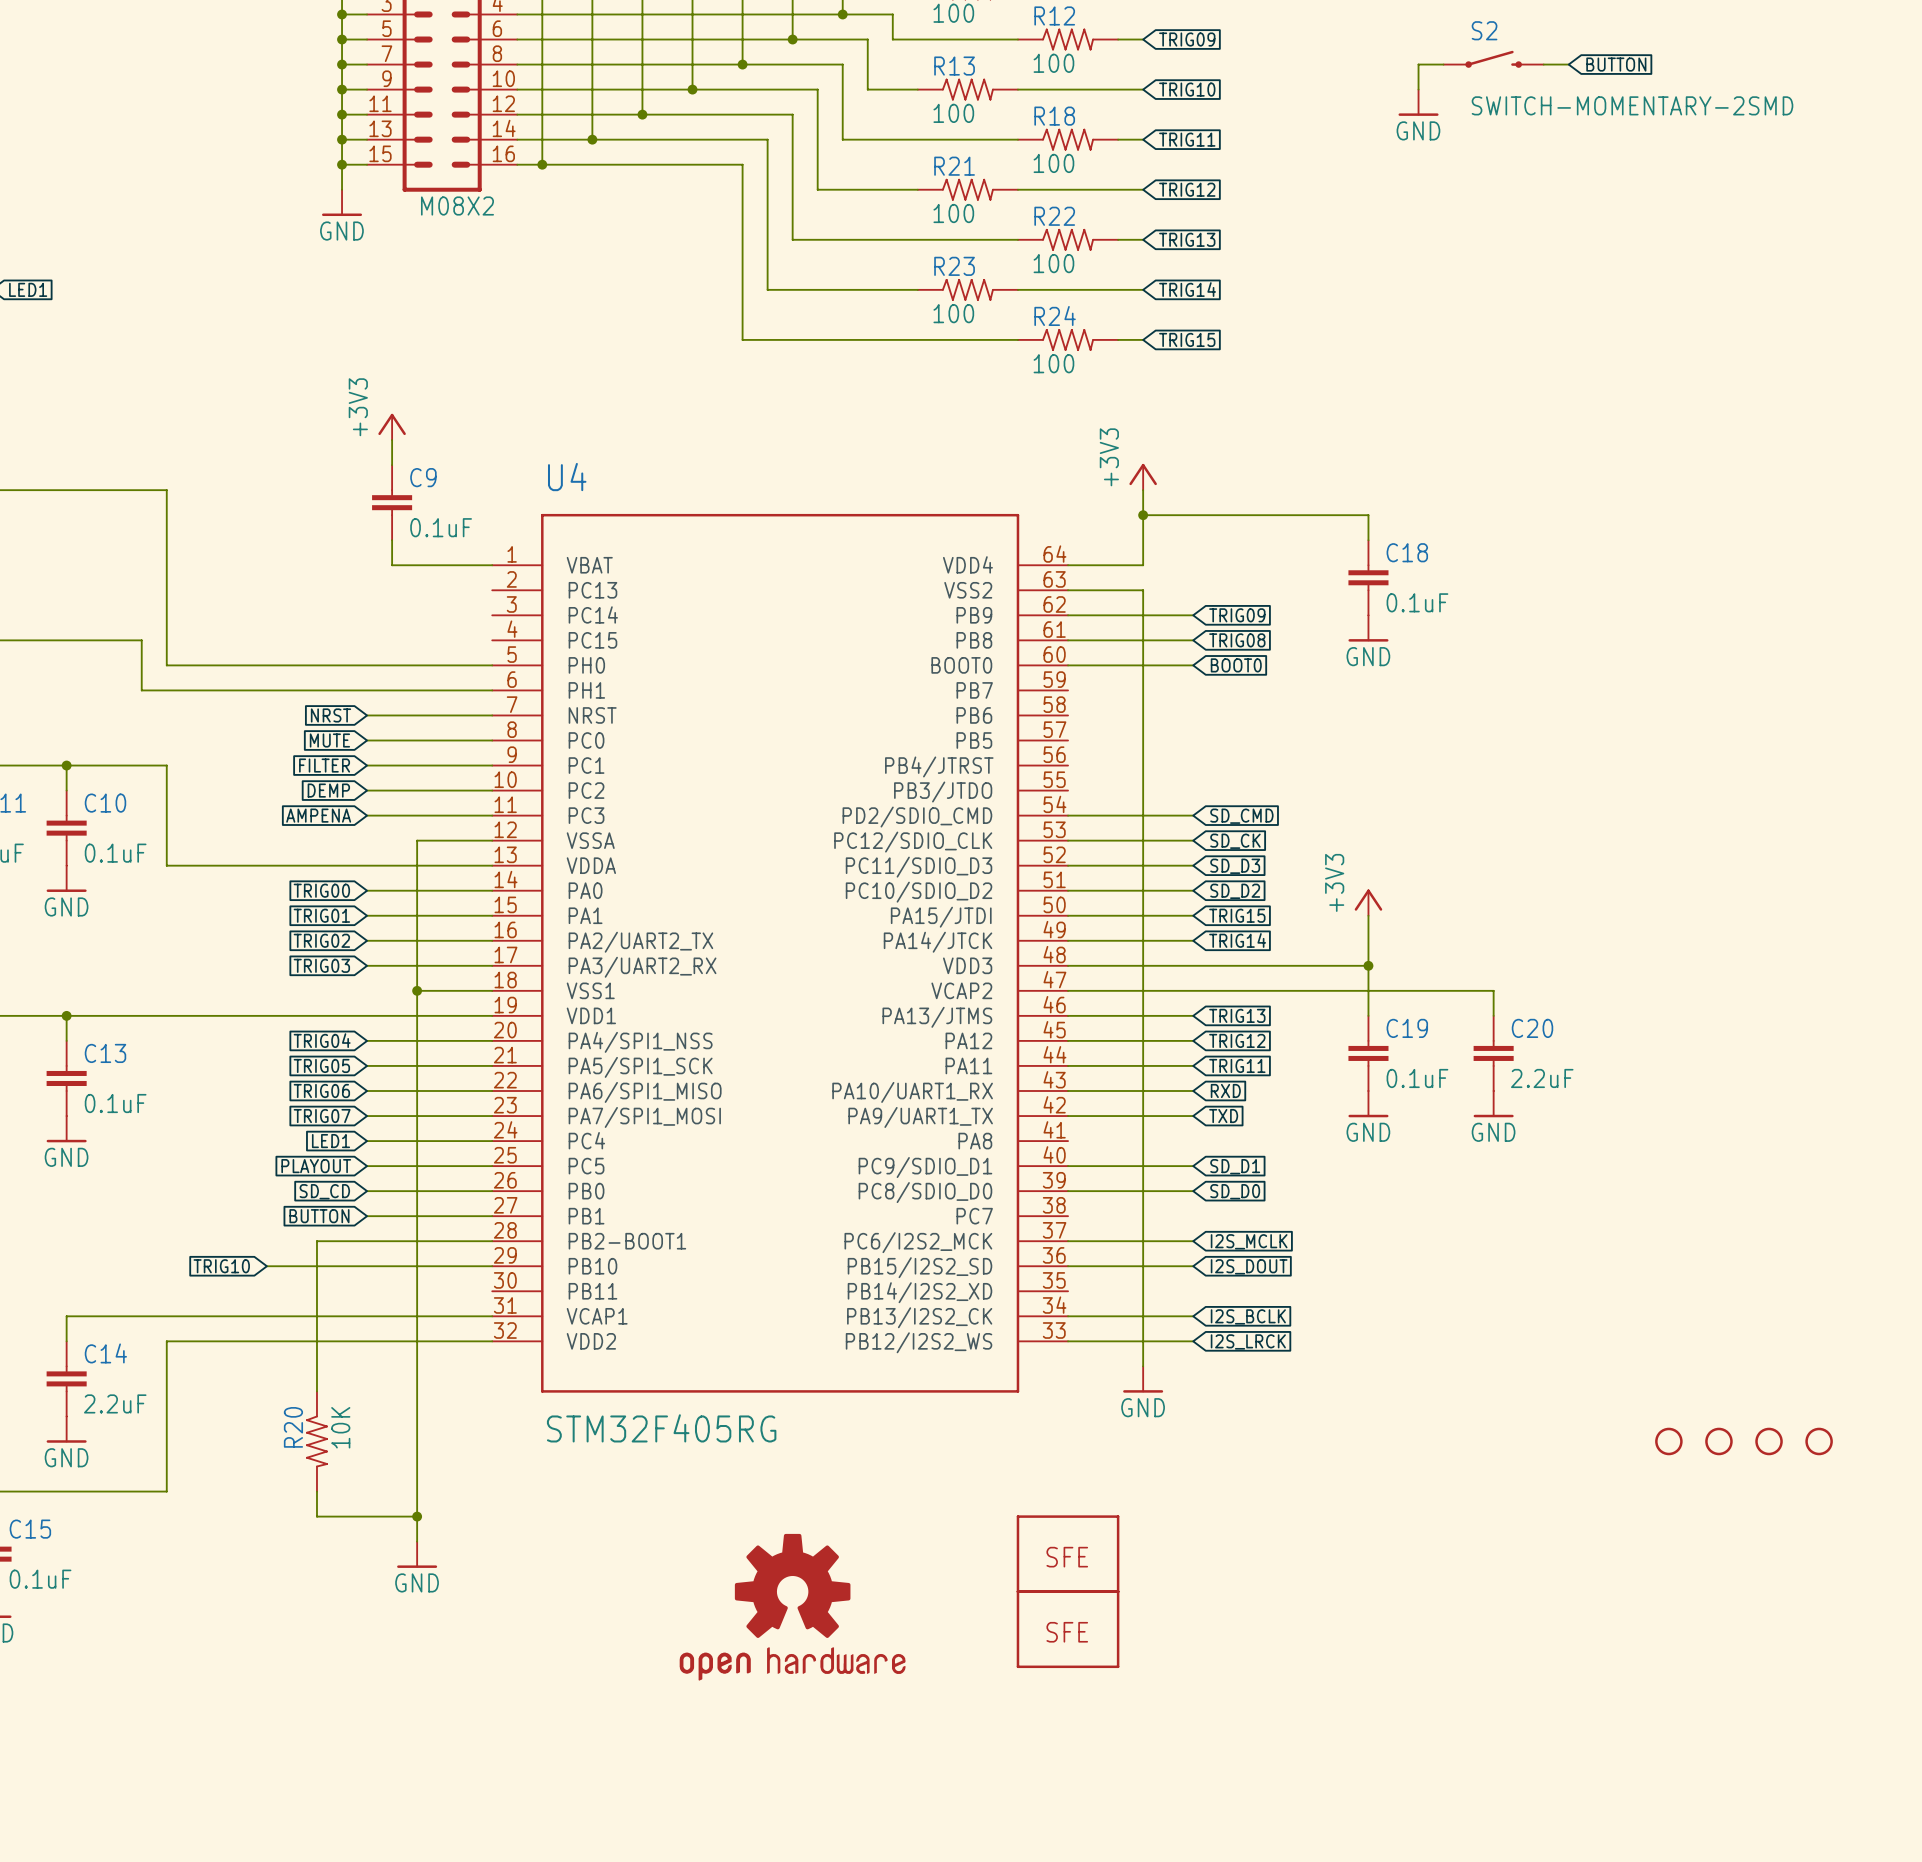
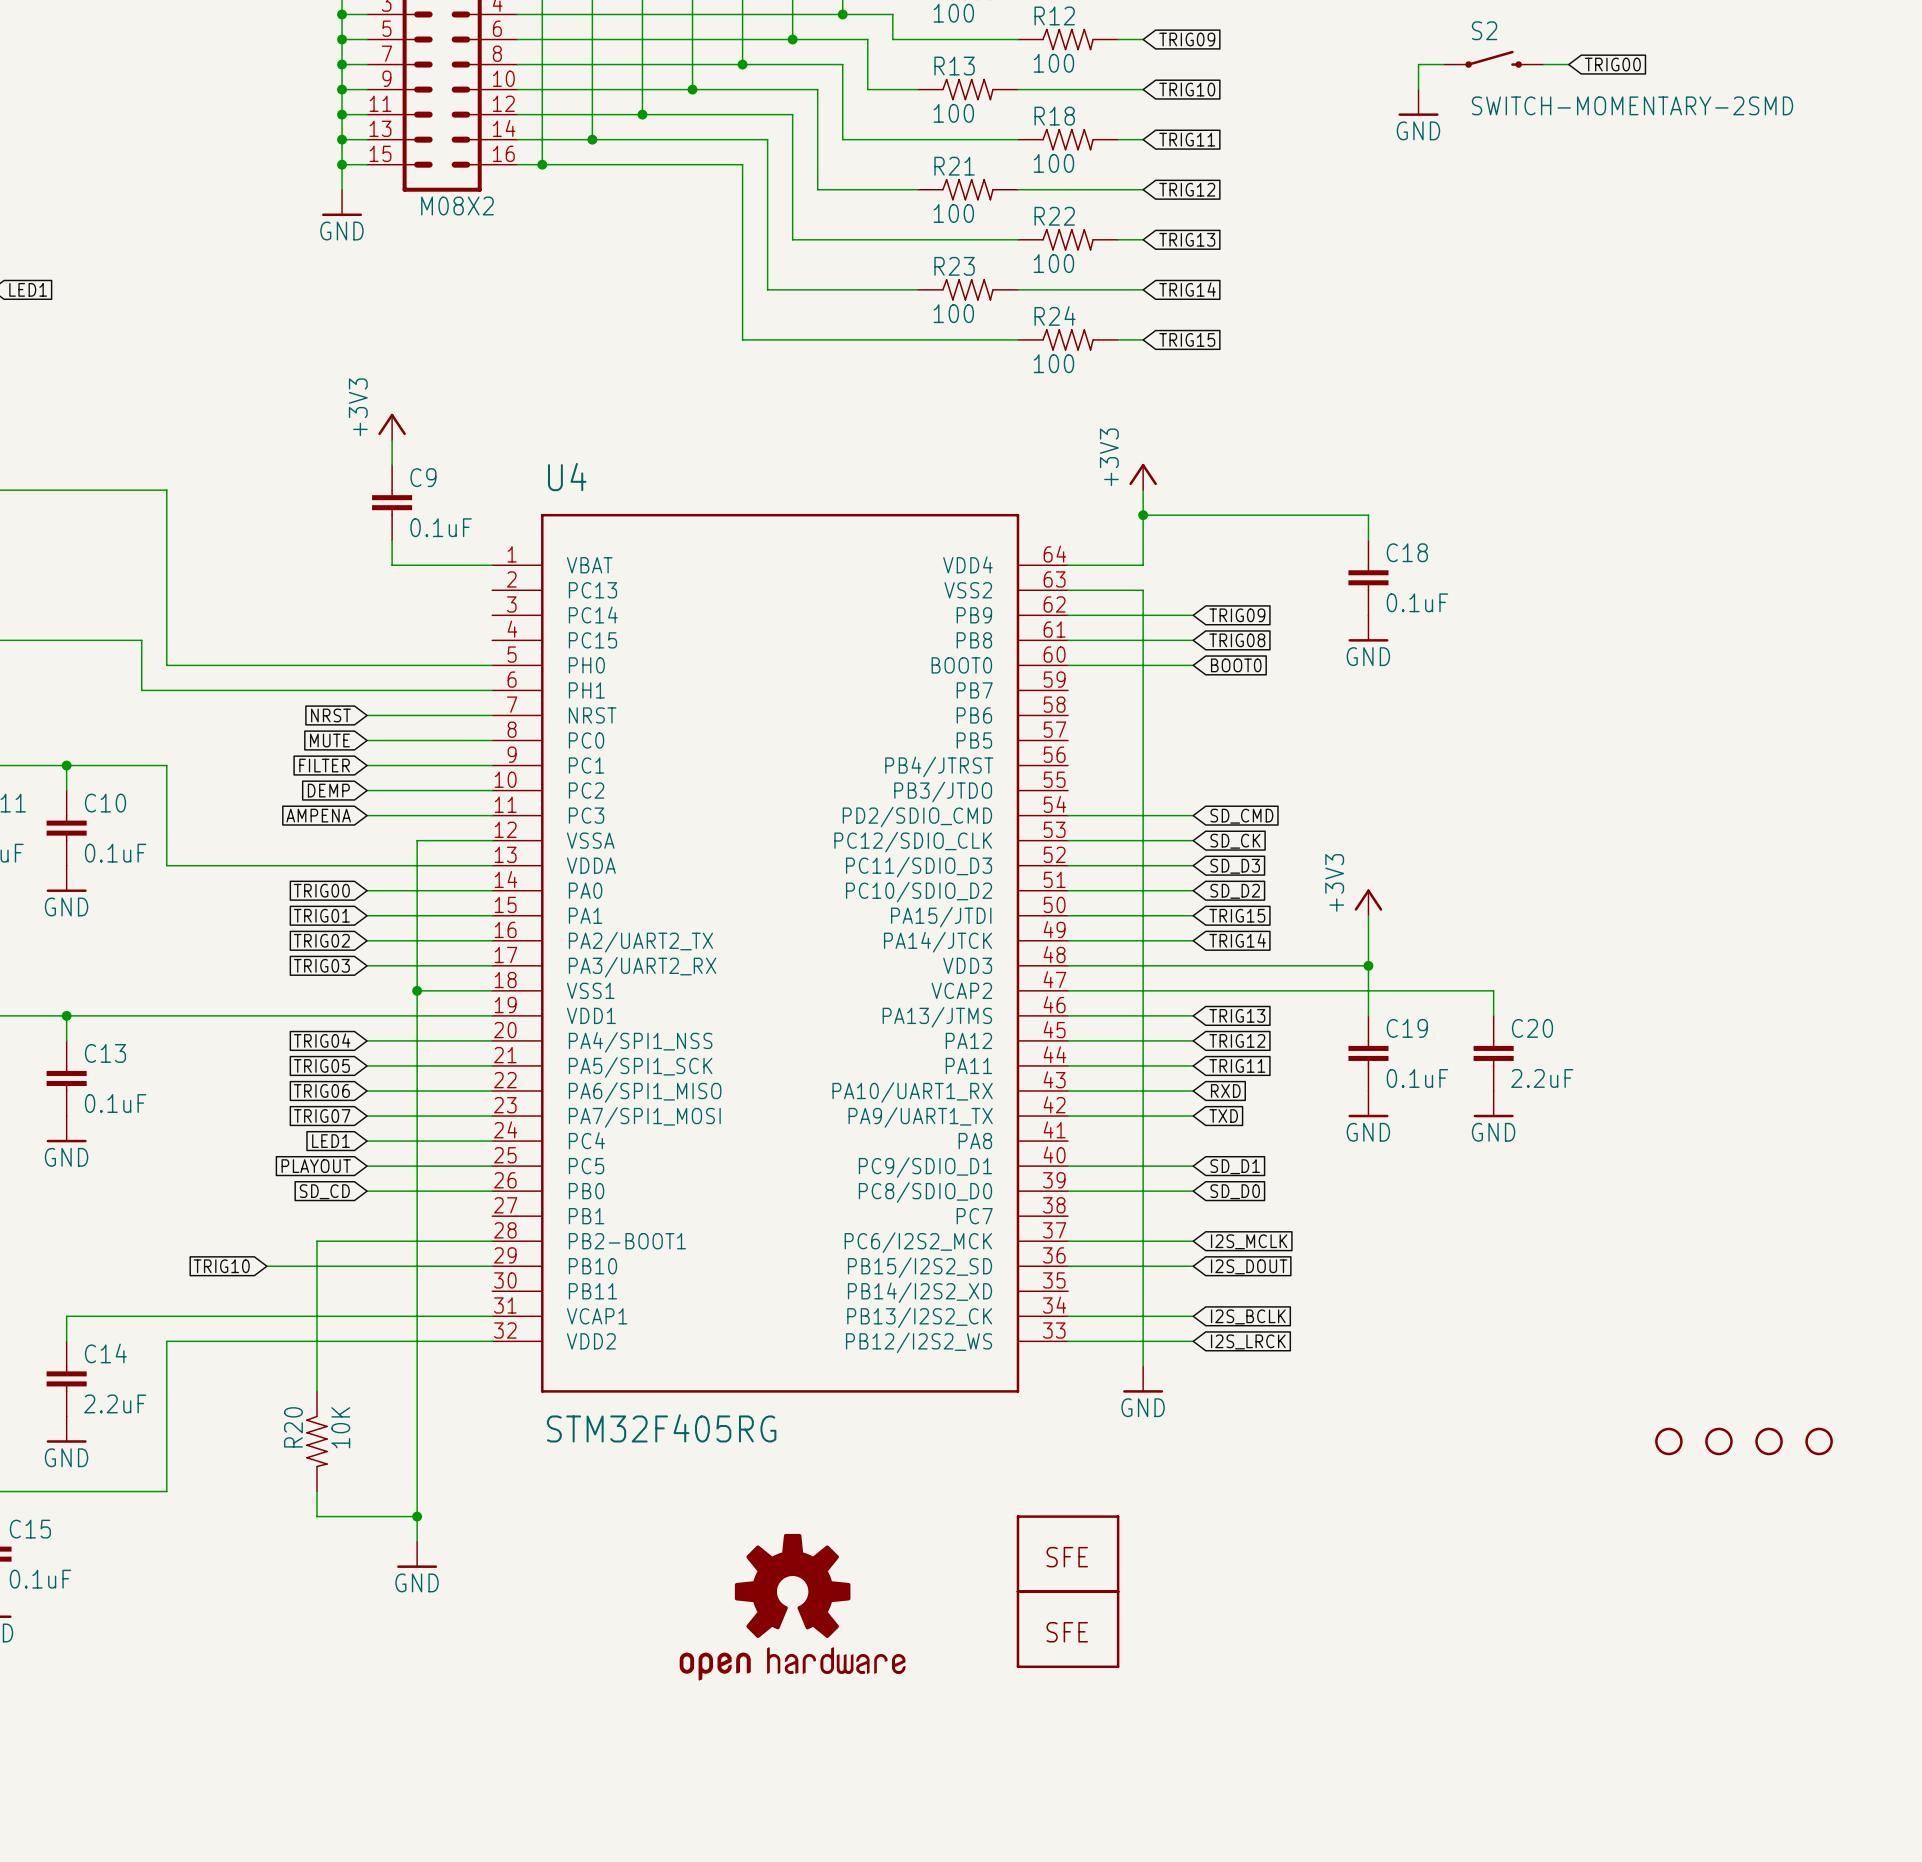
global label: BUTTON (1616, 64) -> TRIG00 (1612, 64)
global label: BUTTON (319, 1216) -> none
wire: (367, 1216) (492, 1216) -> none

